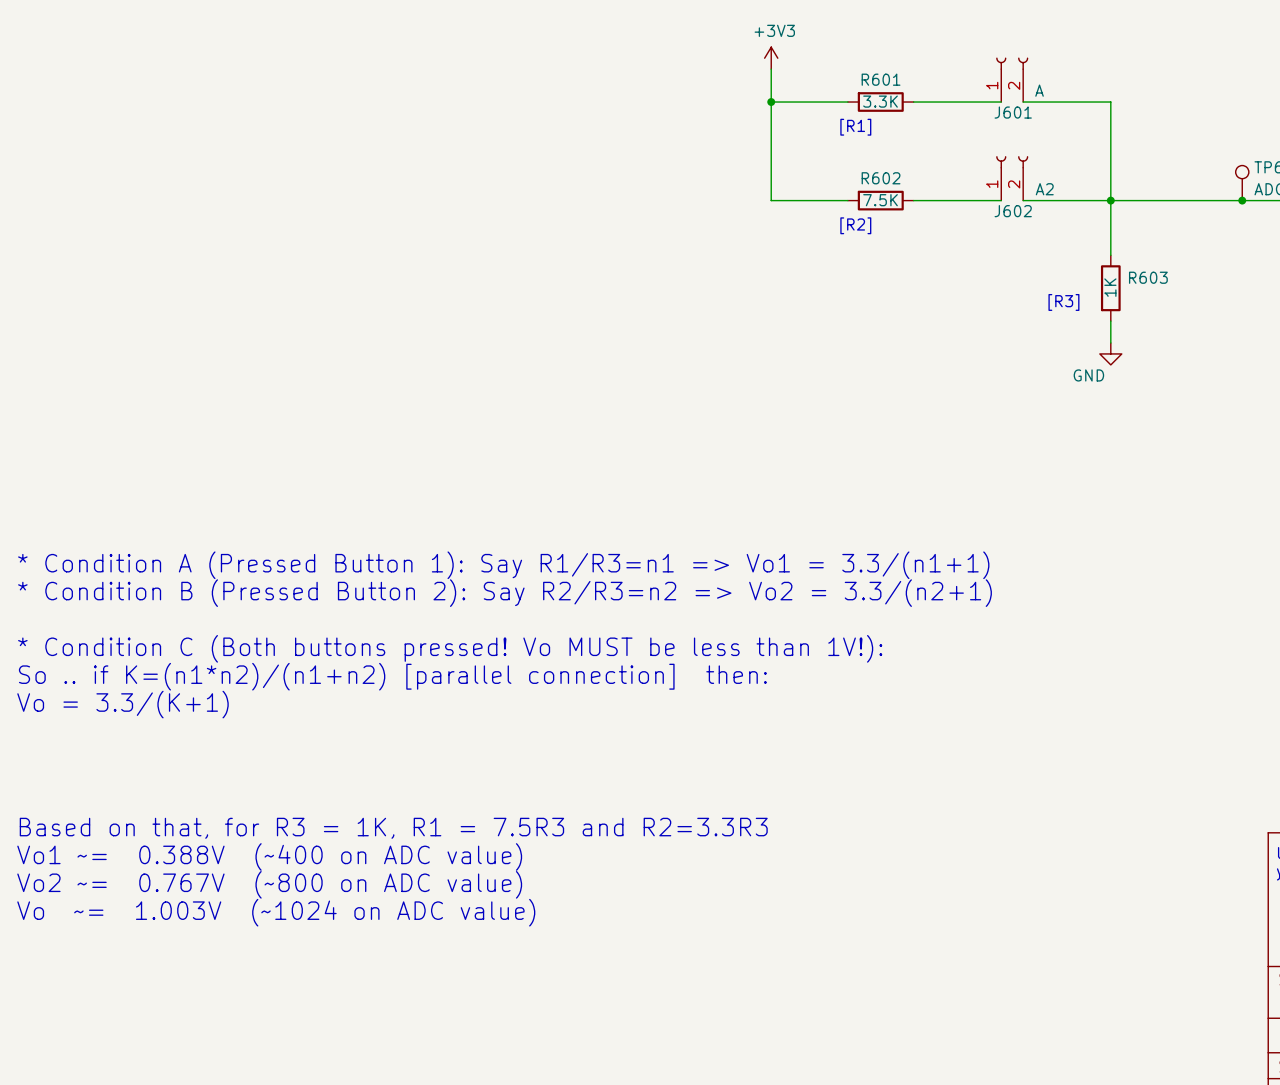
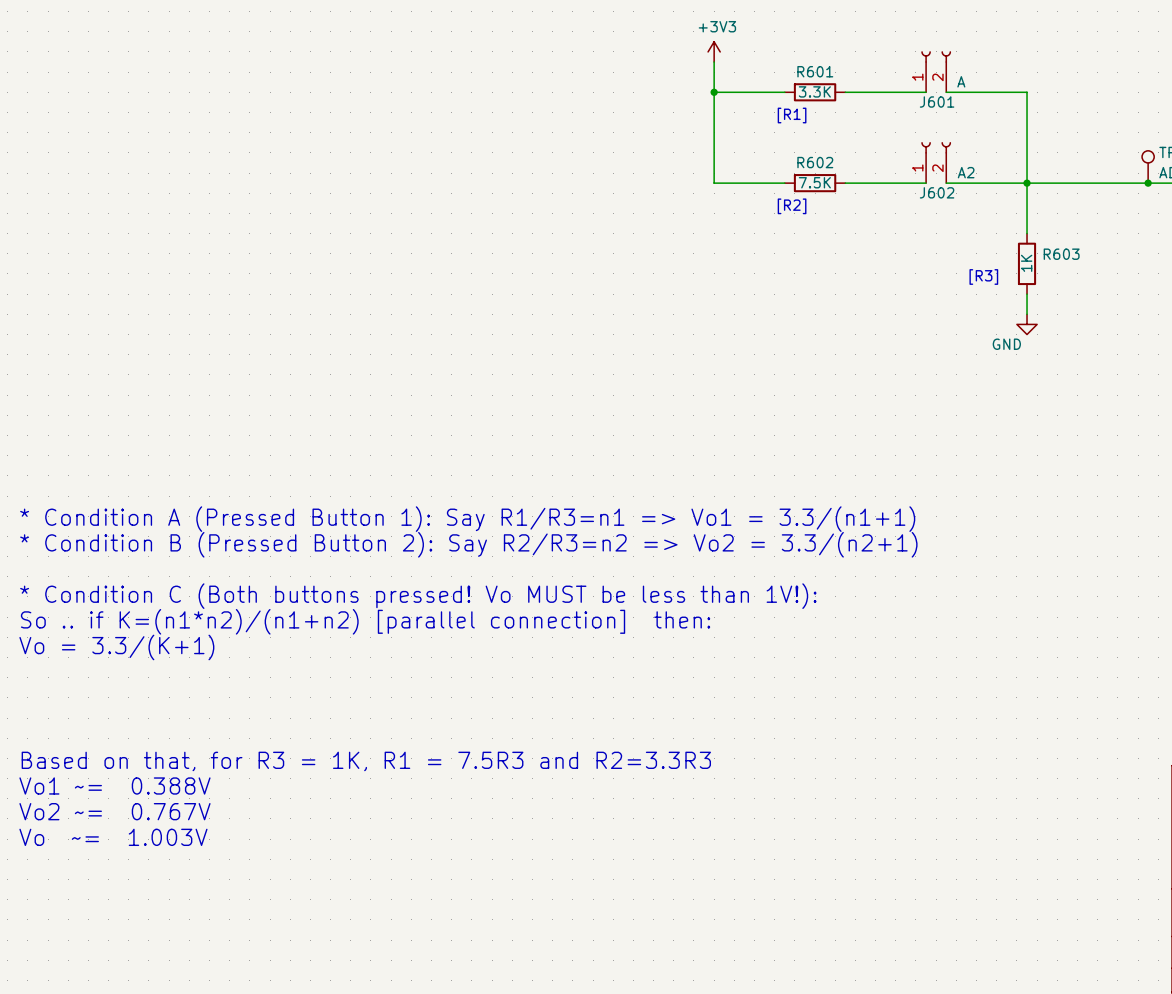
text: Vo1 ~= 0.388V (~400 on ADC value) (269, 856) -> Vo1 ~= 0.388V (114, 785)
text: Vo2 ~= 0.767V (~800 on ADC value) (269, 884) -> Vo2 ~= 0.767V (114, 811)
text: Vo ~= 1.003V (~1024 on ADC value) (276, 912) -> Vo ~= 1.003V (113, 837)

